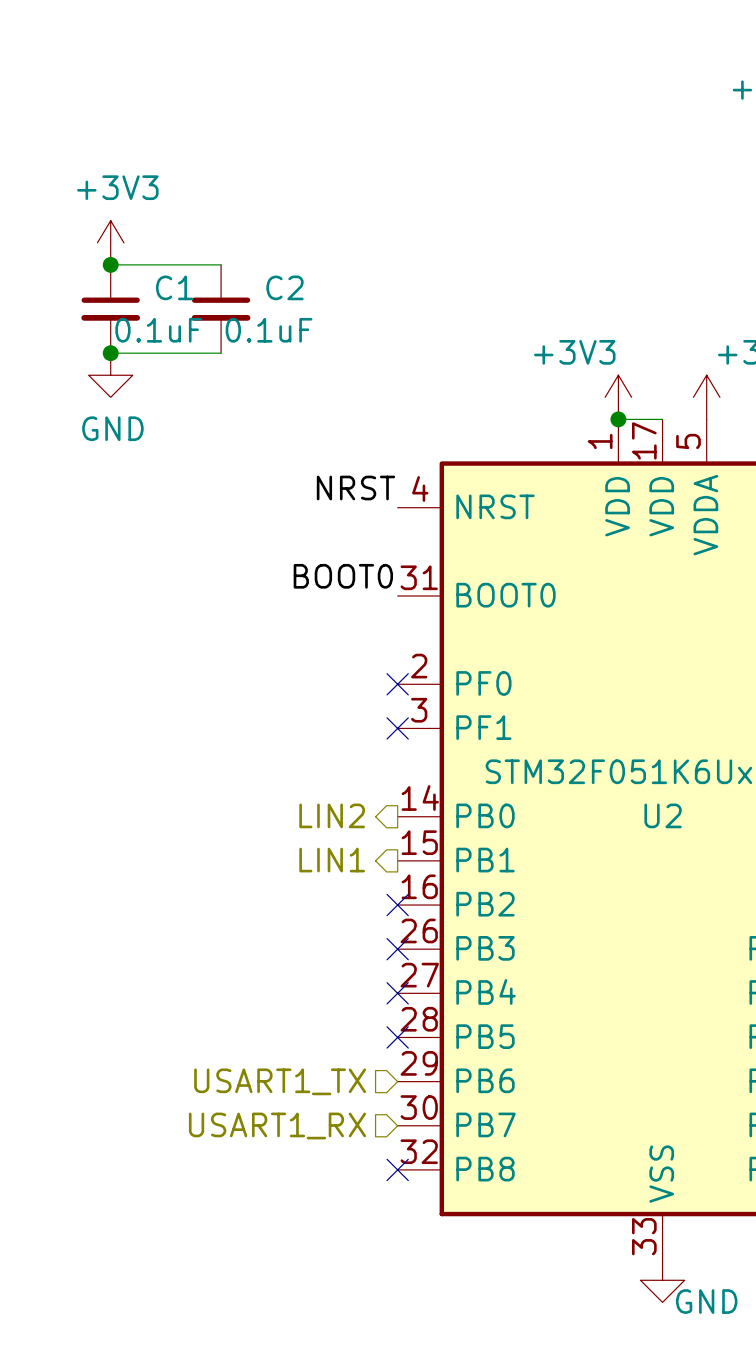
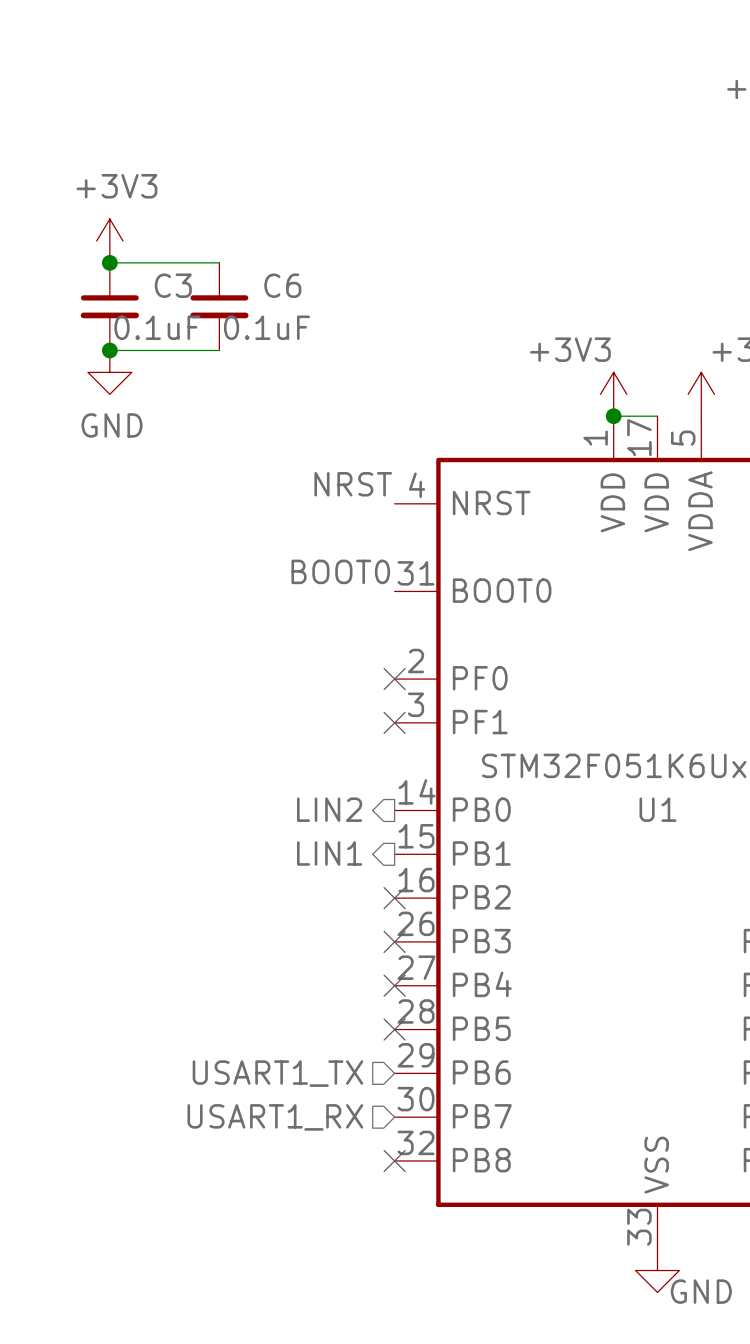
C1 name: C1 (174, 287) -> C3 (173, 285)
C2 name: C2 (284, 287) -> C6 (282, 285)
U2 name: U2 (663, 815) -> U1 (658, 809)

